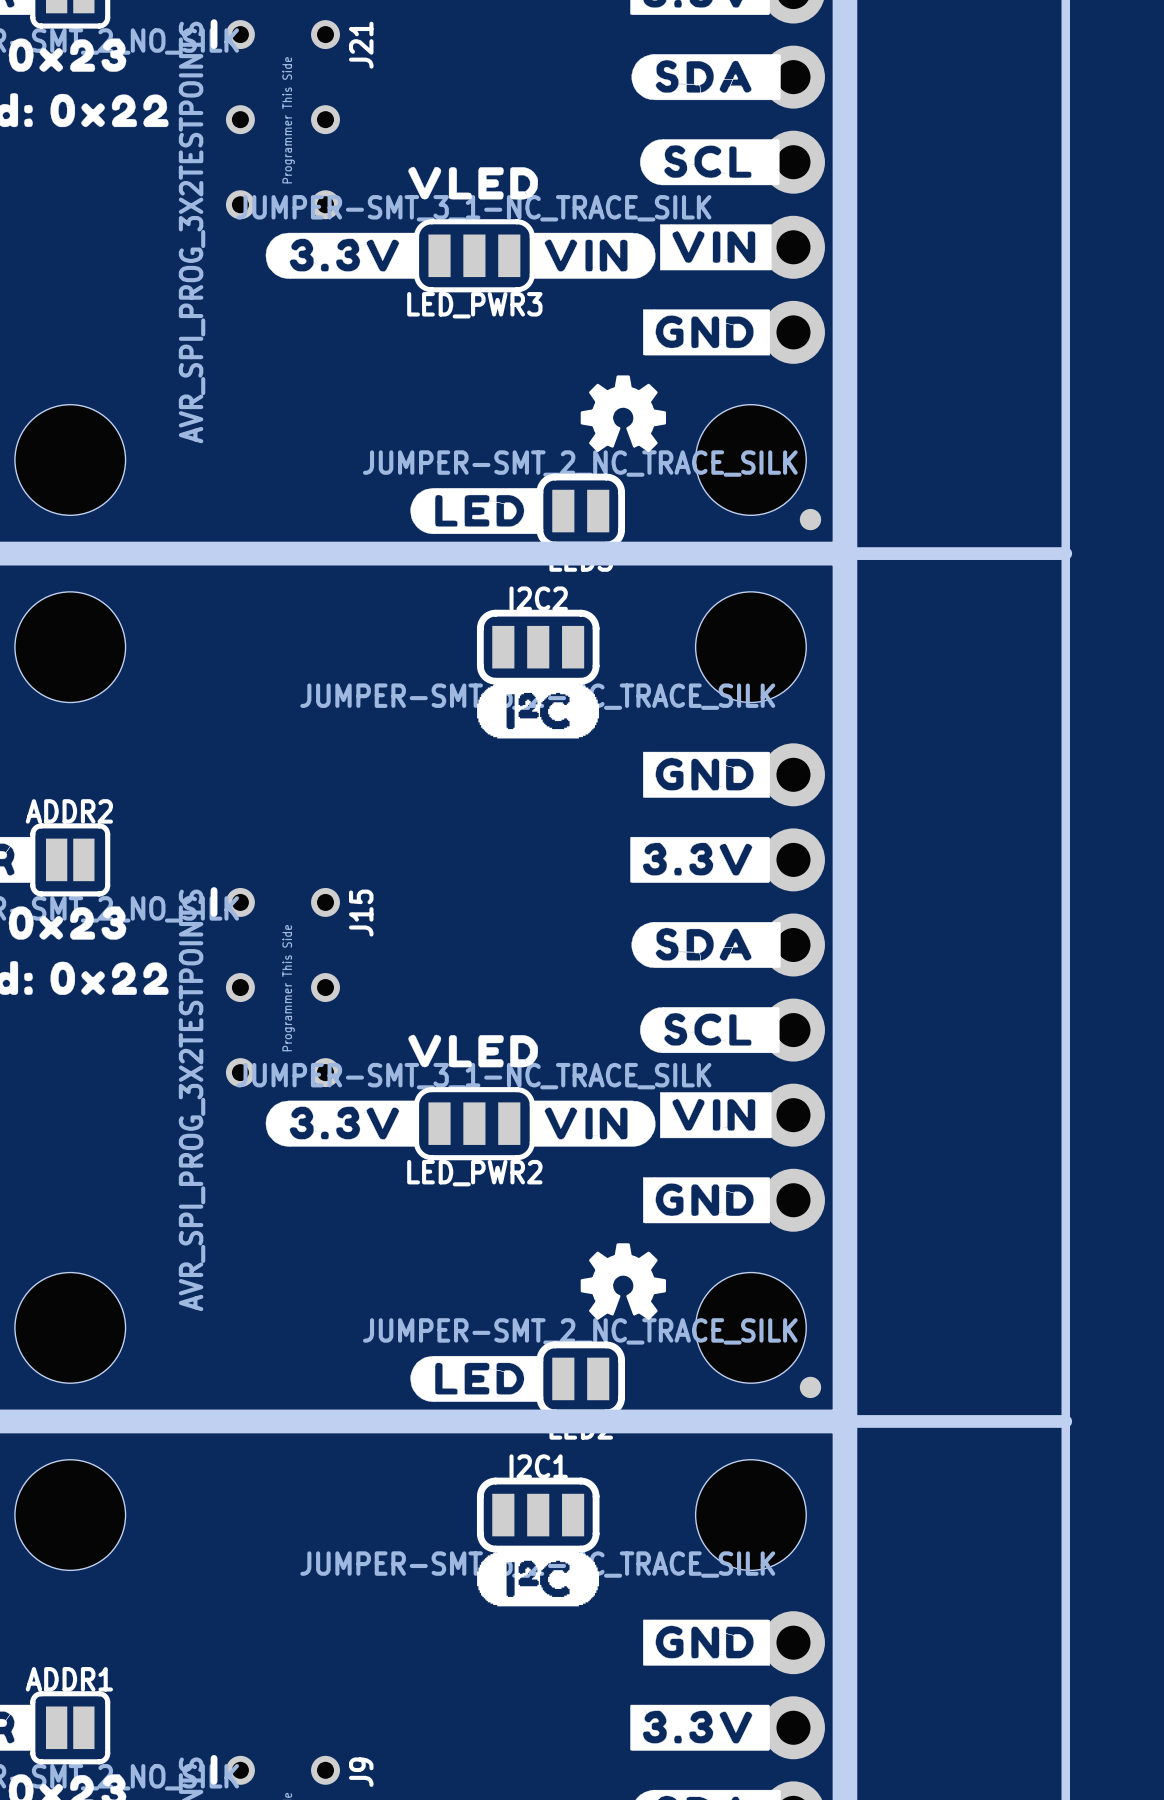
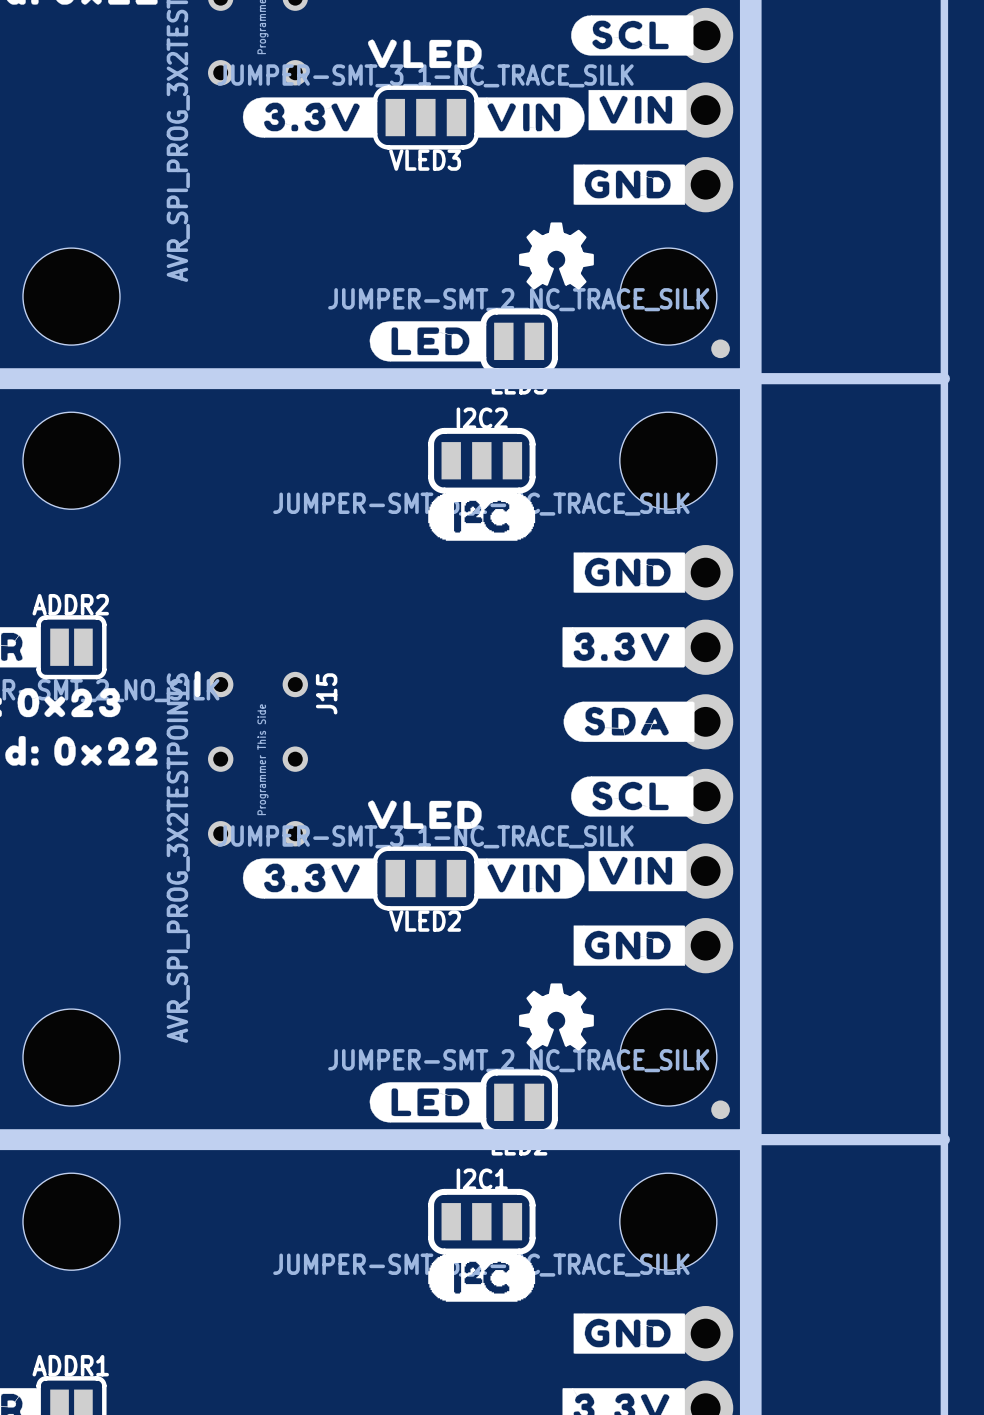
LED_PWR3 name: LED_PWR3 (474, 305) -> VLED3 (425, 160)
LED_PWR2 name: LED_PWR2 (474, 1173) -> VLED2 (425, 921)

